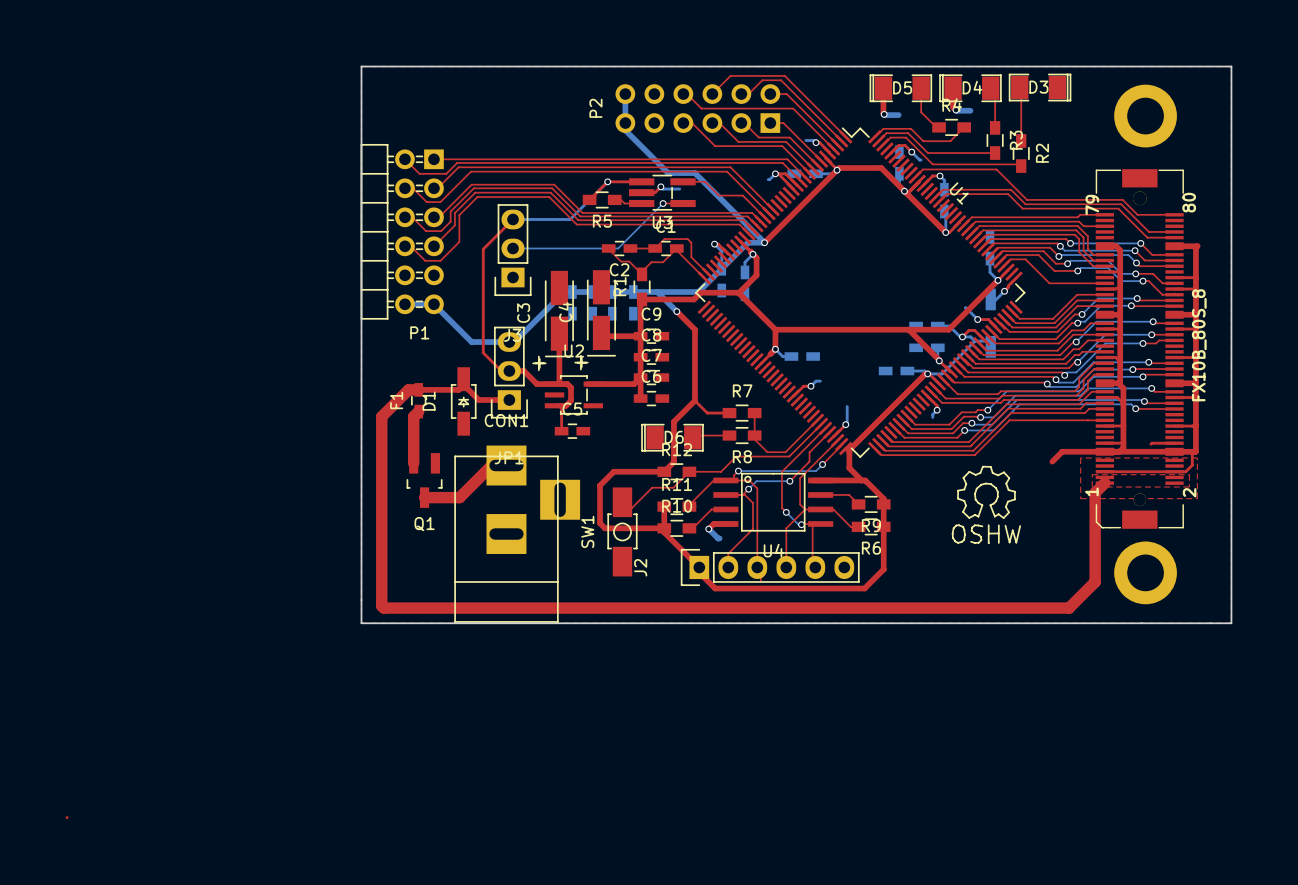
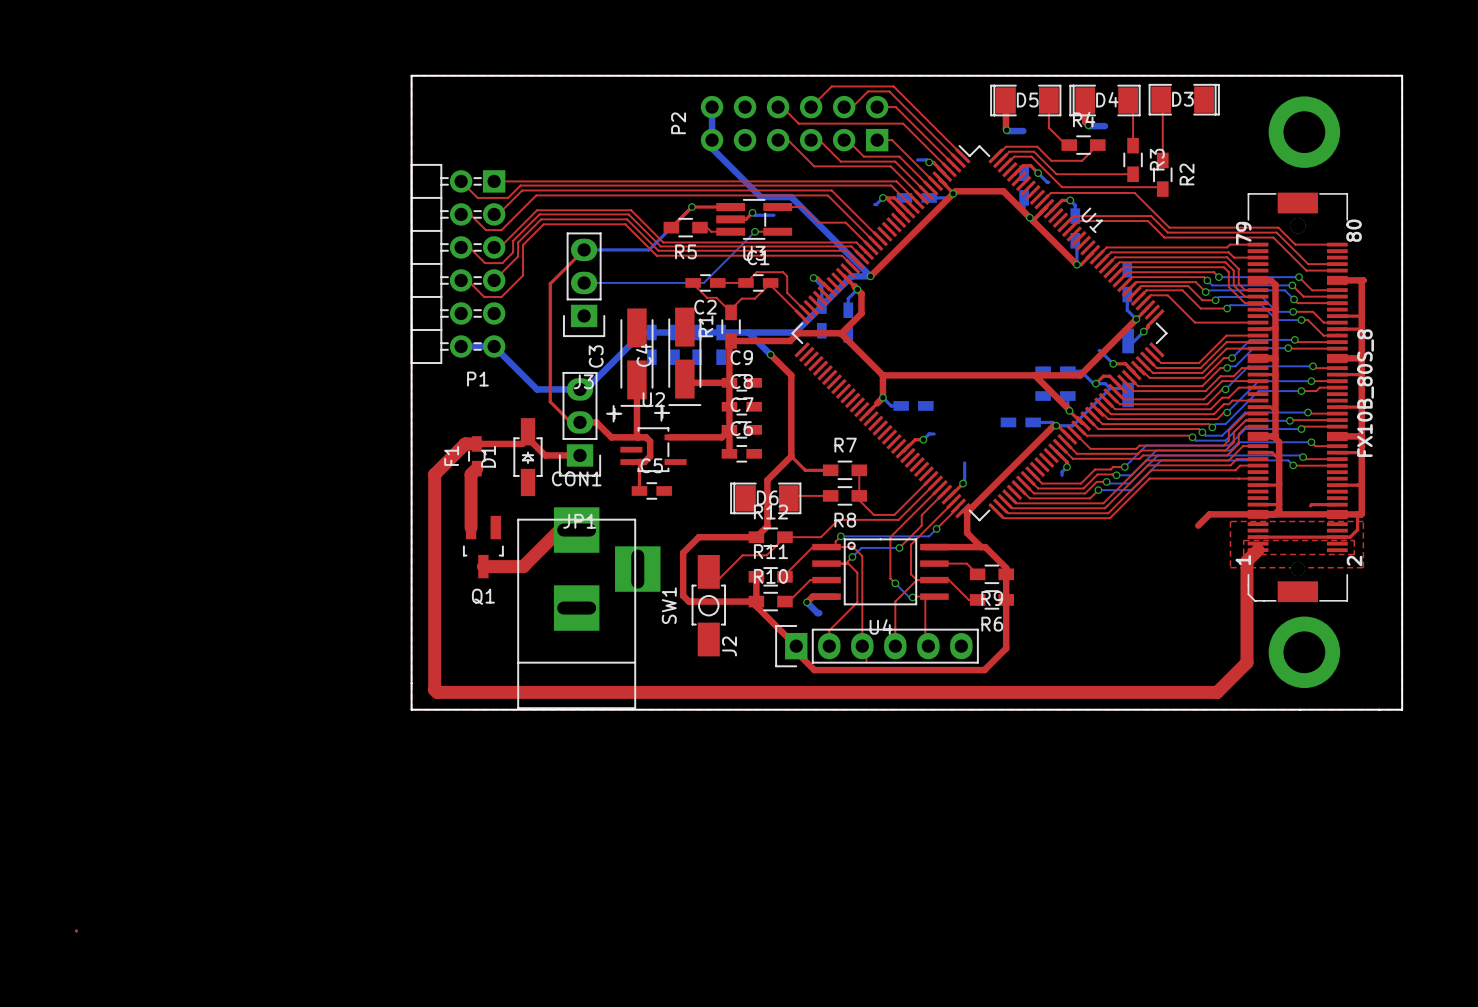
drawing: [951, 465, 1022, 545] -> none

